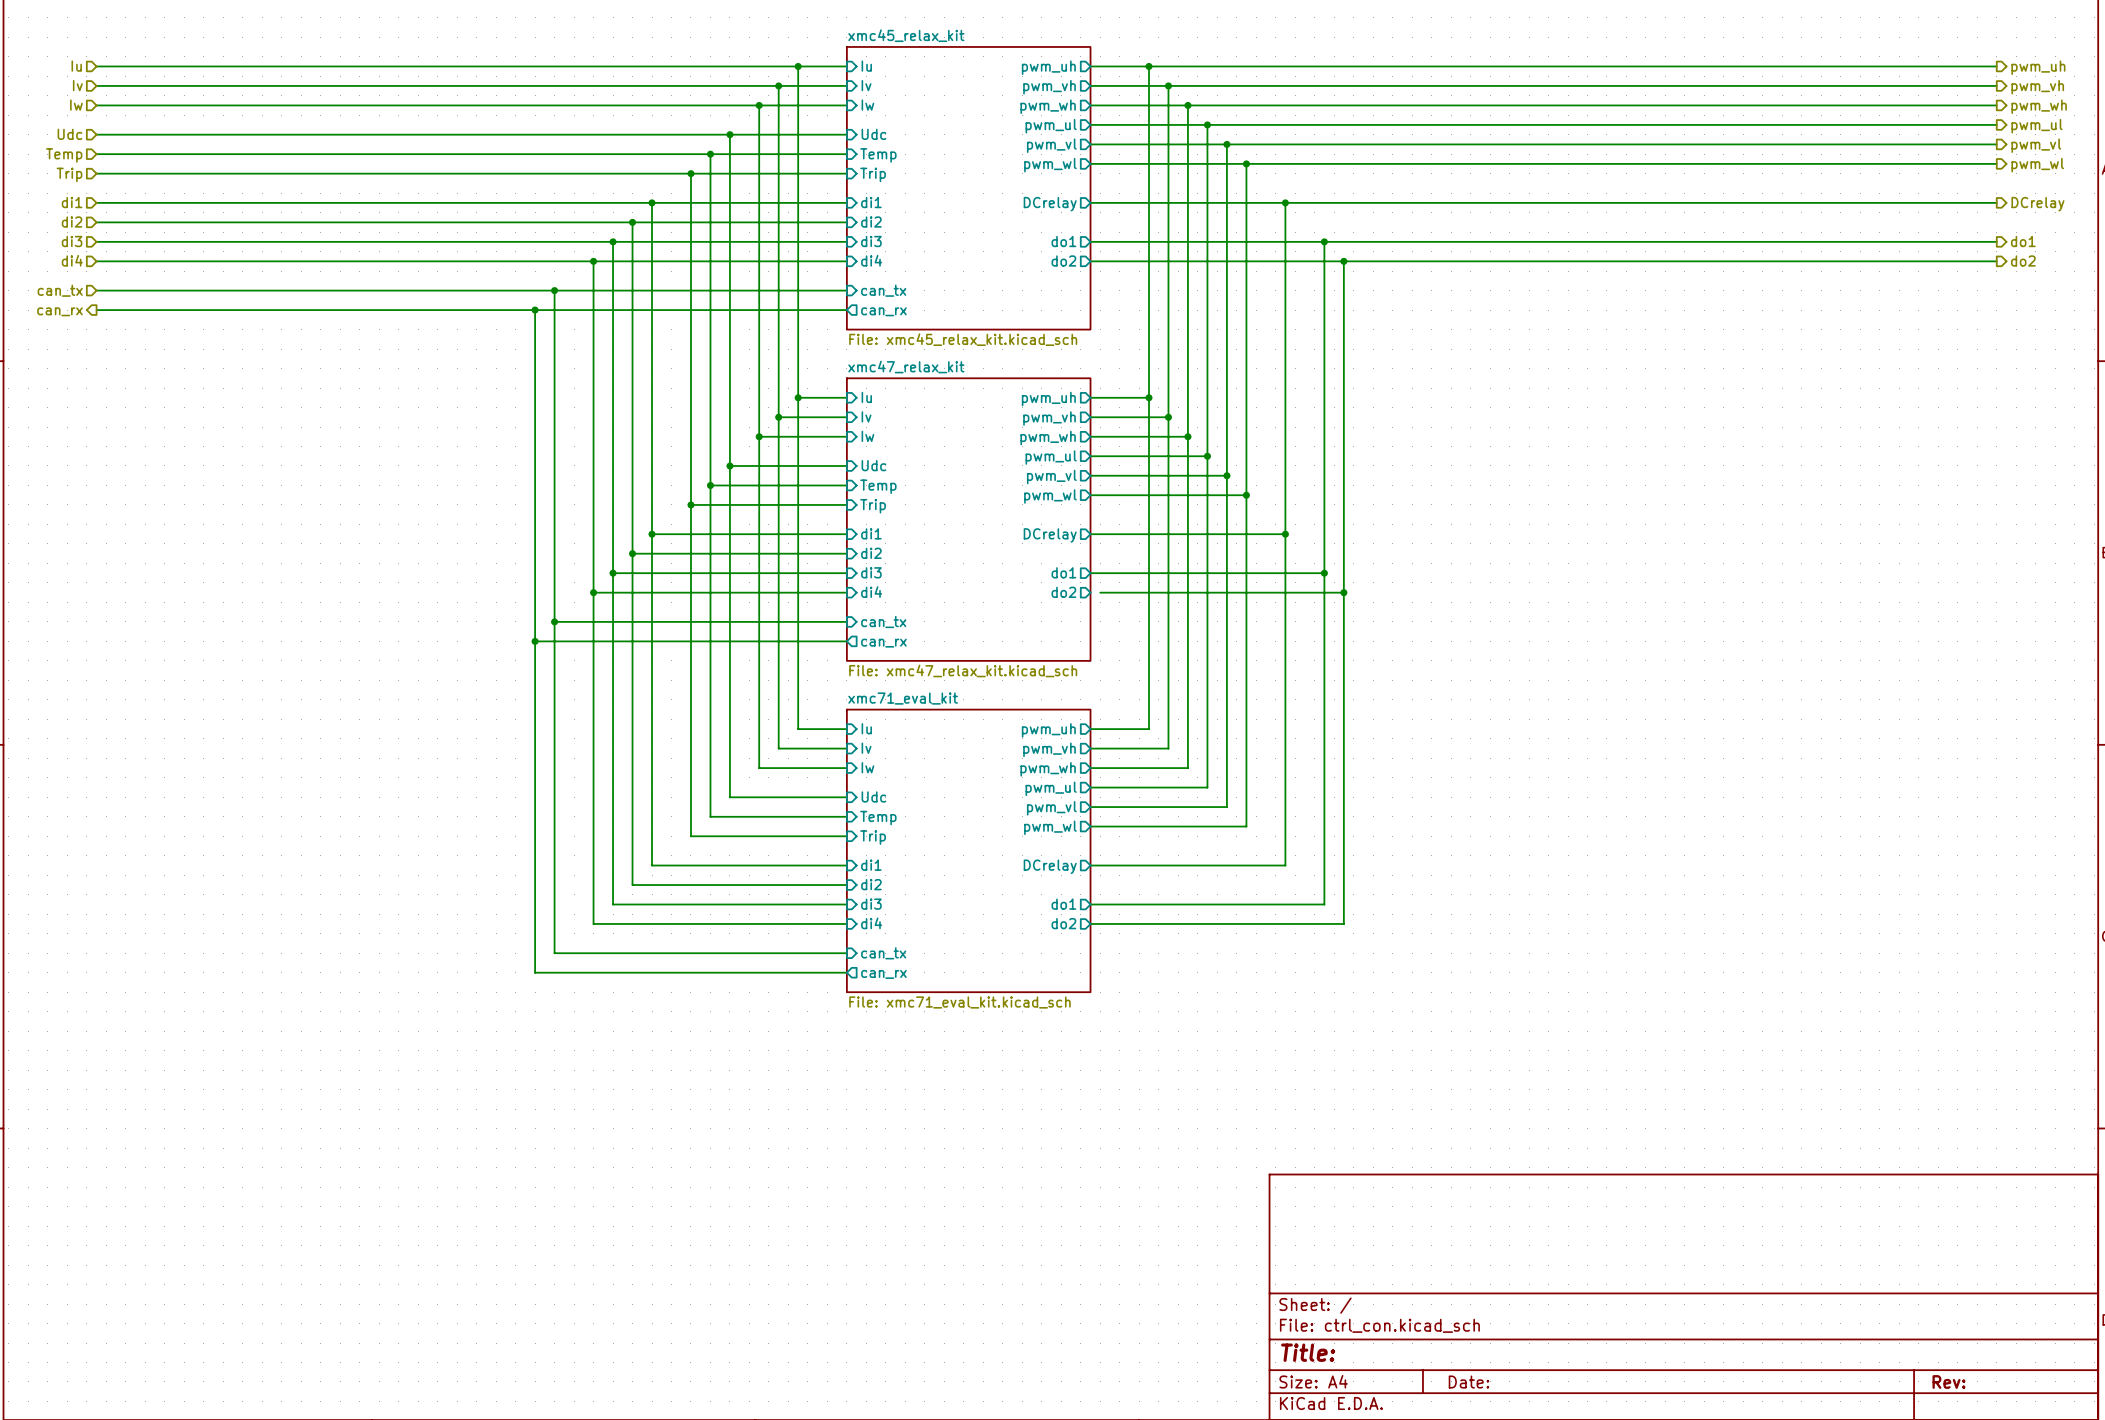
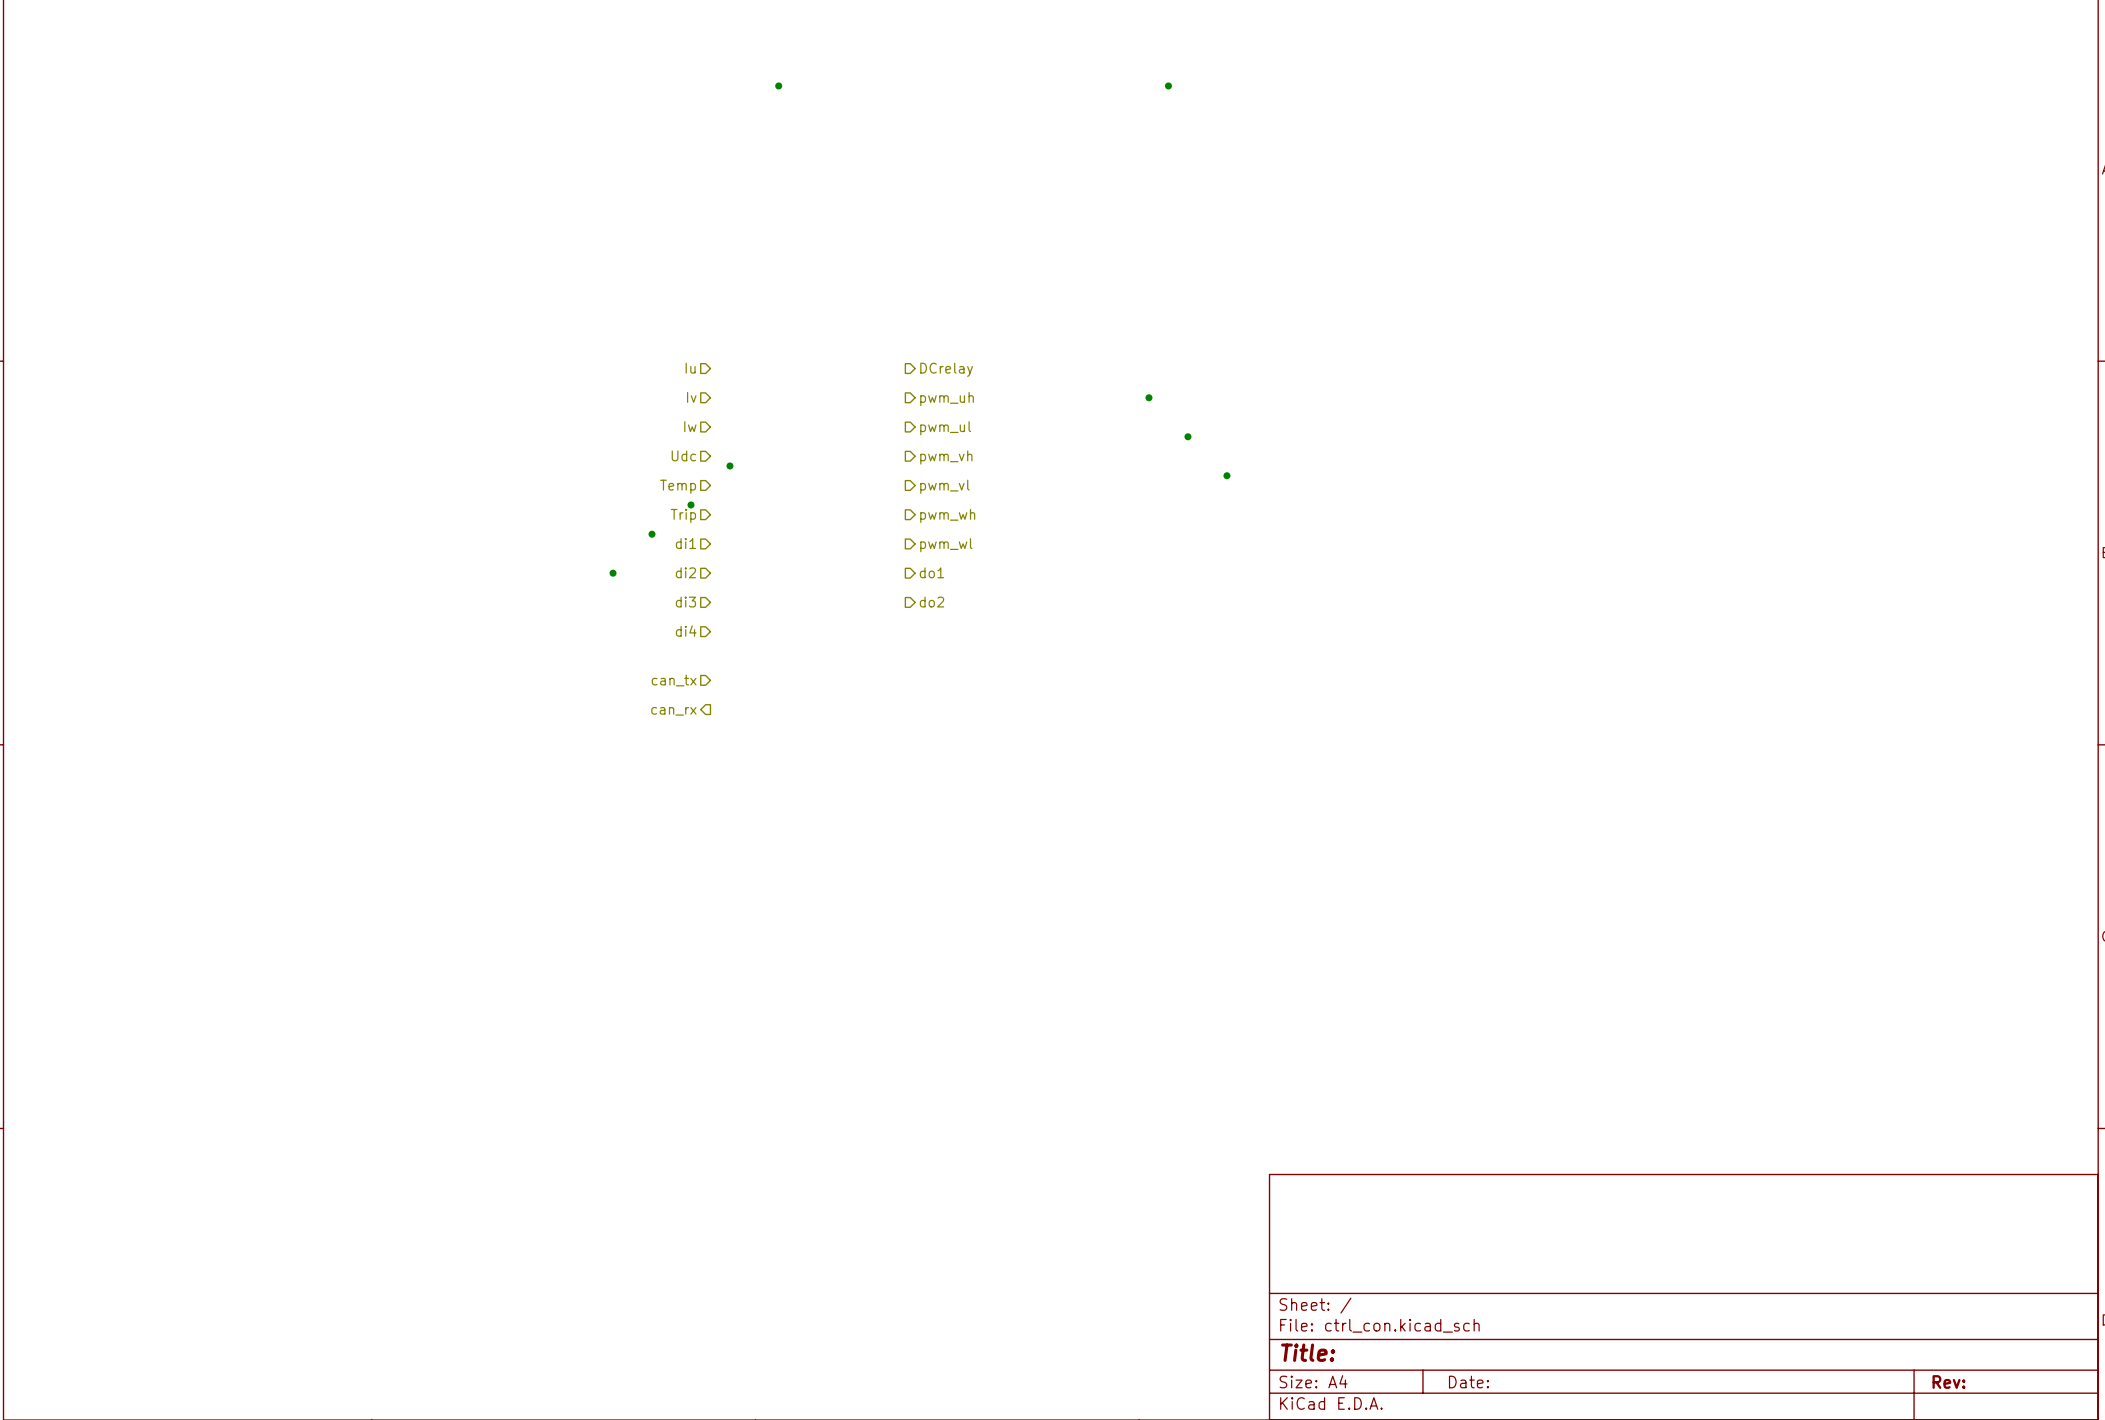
hierarchical label: Iu (76, 66) -> none
wire: (96, 66) (846, 66) -> none
wire: (798, 66) (798, 729) (846, 729) -> none
junction: (798, 66) -> none
sheet pin: Iu (866, 66) -> none
wire: (1090, 66) (1996, 66) -> none
wire: (1148, 66) (1148, 729) (1090, 729) -> none
junction: (1148, 66) -> none
sheet pin: pwm_uh (1048, 67) -> none
hierarchical label: pwm_uh (2038, 67) -> none
hierarchical label: Iv (77, 85) -> none
wire: (96, 85) (846, 85) -> none
wire: (778, 85) (778, 748) (846, 748) -> none
sheet pin: Iv (866, 85) -> none
wire: (1090, 85) (1996, 85) -> none
wire: (1168, 85) (1168, 748) (1090, 748) -> none
sheet pin: pwm_vh (1049, 87) -> none
hierarchical label: pwm_vh (2037, 87) -> none
hierarchical label: Iw (76, 105) -> none
wire: (96, 105) (846, 105) -> none
wire: (759, 105) (759, 768) (846, 768) -> none
junction: (759, 105) -> none
sheet pin: Iw (867, 105) -> none
wire: (1090, 105) (1996, 105) -> none
wire: (1187, 105) (1187, 768) (1090, 768) -> none
junction: (1187, 105) -> none
sheet pin: pwm_wh (1048, 106) -> none
hierarchical label: pwm_wh (2039, 106) -> none
wire: (1090, 124) (1996, 124) -> none
wire: (1207, 124) (1207, 787) (1090, 787) -> none
junction: (1207, 124) -> none
sheet pin: pwm_ul (1051, 126) -> none
hierarchical label: pwm_ul (2037, 126) -> none
hierarchical label: Udc (69, 134) -> none
wire: (96, 134) (846, 134) -> none
wire: (729, 134) (729, 797) (846, 797) -> none
junction: (729, 134) -> none
sheet pin: Udc (873, 134) -> none
wire: (1090, 144) (1996, 144) -> none
wire: (1226, 144) (1226, 807) (1090, 807) -> none
junction: (1226, 144) -> none
sheet pin: pwm_vl (1051, 145) -> none
hierarchical label: pwm_vl (2036, 145) -> none
wire: (96, 154) (846, 154) -> none
wire: (710, 154) (710, 816) (846, 816) -> none
junction: (710, 154) -> none
hierarchical label: Temp (64, 155) -> none
sheet pin: Temp (878, 155) -> none
wire: (1090, 163) (1996, 163) -> none
wire: (1246, 163) (1246, 826) (1090, 826) -> none
junction: (1246, 163) -> none
sheet pin: pwm_wl (1050, 165) -> none
hierarchical label: pwm_wl (2037, 165) -> none
wire: (96, 173) (846, 173) -> none
wire: (690, 173) (690, 836) (846, 836) -> none
junction: (690, 173) -> none
hierarchical label: Trip (69, 174) -> none
sheet pin: Trip (873, 174) -> none
sheet xmc45_relax_kit: File: xmc45_relax_kit.kicad_sch (968, 188) -> none
hierarchical label: di1 (72, 202) -> none
wire: (96, 202) (846, 202) -> none
wire: (652, 202) (652, 865) (846, 865) -> none
junction: (652, 202) -> none
sheet pin: di1 (871, 202) -> none
wire: (1090, 202) (1996, 202) -> none
wire: (1285, 202) (1285, 865) (1090, 865) -> none
junction: (1285, 202) -> none
sheet pin: DCrelay (1050, 204) -> none
hierarchical label: DCrelay (2037, 204) -> none
hierarchical label: di2 (72, 222) -> none
wire: (96, 222) (846, 222) -> none
wire: (632, 222) (632, 885) (846, 885) -> none
junction: (632, 222) -> none
sheet pin: di2 (871, 222) -> none
hierarchical label: di3 (72, 241) -> none
wire: (96, 241) (846, 241) -> none
wire: (613, 241) (613, 904) (846, 904) -> none
junction: (613, 241) -> none
sheet pin: di3 (871, 241) -> none
sheet pin: do1 (1063, 241) -> none
wire: (1090, 241) (1996, 241) -> none
wire: (1324, 241) (1324, 904) (1090, 904) -> none
junction: (1324, 241) -> none
hierarchical label: do1 (2023, 241) -> none
hierarchical label: di4 (72, 260) -> none
sheet pin: di4 (871, 260) -> none
sheet pin: do2 (1063, 260) -> none
hierarchical label: do2 (2023, 260) -> none
wire: (96, 261) (846, 261) -> none
wire: (593, 261) (593, 923) (846, 923) -> none
junction: (593, 261) -> none
wire: (1090, 261) (1996, 261) -> none
wire: (1343, 261) (1343, 923) (1090, 923) -> none
junction: (1343, 261) -> none
hierarchical label: can_tx (60, 290) -> none
wire: (96, 290) (846, 290) -> none
wire: (554, 290) (554, 953) (846, 953) -> none
junction: (554, 290) -> none
sheet pin: can_tx (883, 290) -> none
wire: (96, 310) (846, 310) -> none
wire: (535, 310) (535, 972) (846, 972) -> none
junction: (535, 310) -> none
hierarchical label: can_rx (59, 311) -> none
sheet pin: can_rx (883, 311) -> none
hierarchical label: none -> Iu (690, 368)
hierarchical label: none -> DCrelay (946, 369)
hierarchical label: none -> Iv (691, 397)
wire: (798, 397) (846, 397) -> none
junction: (798, 397) -> none
sheet pin: Iu (866, 397) -> none
wire: (1090, 397) (1148, 397) -> none
hierarchical label: none -> pwm_uh (947, 399)
sheet pin: pwm_uh (1048, 399) -> none
sheet pin: Iv (866, 416) -> none
wire: (778, 417) (846, 417) -> none
junction: (778, 417) -> none
wire: (1090, 417) (1168, 417) -> none
junction: (1168, 417) -> none
sheet pin: pwm_vh (1049, 418) -> none
hierarchical label: none -> Iw (690, 426)
hierarchical label: none -> pwm_ul (945, 428)
wire: (759, 436) (846, 436) -> none
junction: (759, 436) -> none
sheet pin: Iw (867, 436) -> none
wire: (1090, 436) (1187, 436) -> none
sheet pin: pwm_wh (1048, 438) -> none
hierarchical label: none -> Udc (683, 455)
wire: (1090, 456) (1207, 456) -> none
junction: (1207, 456) -> none
hierarchical label: none -> pwm_vh (946, 457)
sheet pin: pwm_ul (1051, 457) -> none
wire: (729, 465) (846, 465) -> none
sheet pin: Udc (873, 465) -> none
wire: (1090, 475) (1226, 475) -> none
sheet pin: pwm_vl (1051, 477) -> none
wire: (710, 485) (846, 485) -> none
junction: (710, 485) -> none
hierarchical label: none -> Temp (678, 486)
sheet pin: Temp (878, 486) -> none
hierarchical label: none -> pwm_vl (944, 486)
wire: (1090, 495) (1246, 495) -> none
junction: (1246, 495) -> none
sheet pin: pwm_wl (1050, 496) -> none
wire: (690, 504) (846, 504) -> none
sheet pin: Trip (873, 506) -> none
hierarchical label: none -> Trip (683, 515)
hierarchical label: none -> pwm_wh (947, 515)
sheet xmc47_relax_kit: File: xmc47_relax_kit.kicad_sch (968, 519) -> none
sheet pin: di1 (871, 533) -> none
wire: (652, 534) (846, 534) -> none
wire: (1090, 534) (1285, 534) -> none
junction: (1285, 534) -> none
sheet pin: DCrelay (1050, 535) -> none
hierarchical label: none -> di1 (685, 543)
hierarchical label: none -> pwm_wl (946, 545)
wire: (632, 553) (846, 553) -> none
junction: (632, 553) -> none
sheet pin: di2 (871, 553) -> none
hierarchical label: none -> di2 (685, 572)
sheet pin: di3 (871, 572) -> none
hierarchical label: none -> do1 (931, 572)
sheet pin: do1 (1063, 572) -> none
wire: (613, 573) (846, 573) -> none
wire: (1090, 573) (1324, 573) -> none
junction: (1324, 573) -> none
wire: (593, 592) (846, 592) -> none
junction: (593, 592) -> none
sheet pin: di4 (871, 592) -> none
sheet pin: do2 (1063, 592) -> none
wire: (1100, 592) (1343, 592) -> none
junction: (1343, 592) -> none
hierarchical label: none -> di3 (685, 602)
hierarchical label: none -> do2 (931, 602)
wire: (554, 621) (846, 621) -> none
junction: (554, 621) -> none
sheet pin: can_tx (883, 622) -> none
hierarchical label: none -> di4 (686, 631)
wire: (535, 641) (846, 641) -> none
junction: (535, 641) -> none
sheet pin: can_rx (883, 643) -> none
hierarchical label: none -> can_tx (674, 680)
hierarchical label: none -> can_rx (673, 711)
sheet pin: Iu (866, 728) -> none
sheet pin: pwm_uh (1048, 730) -> none
sheet pin: Iv (866, 748) -> none
sheet pin: pwm_vh (1049, 749) -> none
sheet pin: Iw (867, 767) -> none
sheet pin: pwm_wh (1048, 769) -> none
sheet pin: pwm_ul (1051, 788) -> none
sheet pin: Udc (873, 796) -> none
sheet pin: pwm_vl (1051, 808) -> none
sheet pin: Temp (878, 818) -> none
sheet pin: pwm_wl (1050, 827) -> none
sheet pin: Trip (873, 837) -> none
sheet xmc71_eval_kit: File: xmc71_eval_kit.kicad_sch (968, 850) -> none
sheet pin: di1 (871, 865) -> none
sheet pin: DCrelay (1050, 866) -> none
sheet pin: di2 (871, 884) -> none
sheet pin: di3 (871, 904) -> none
sheet pin: do1 (1063, 904) -> none
sheet pin: di4 (871, 923) -> none
sheet pin: do2 (1063, 923) -> none
sheet pin: can_tx (883, 953) -> none
sheet pin: can_rx (883, 974) -> none

